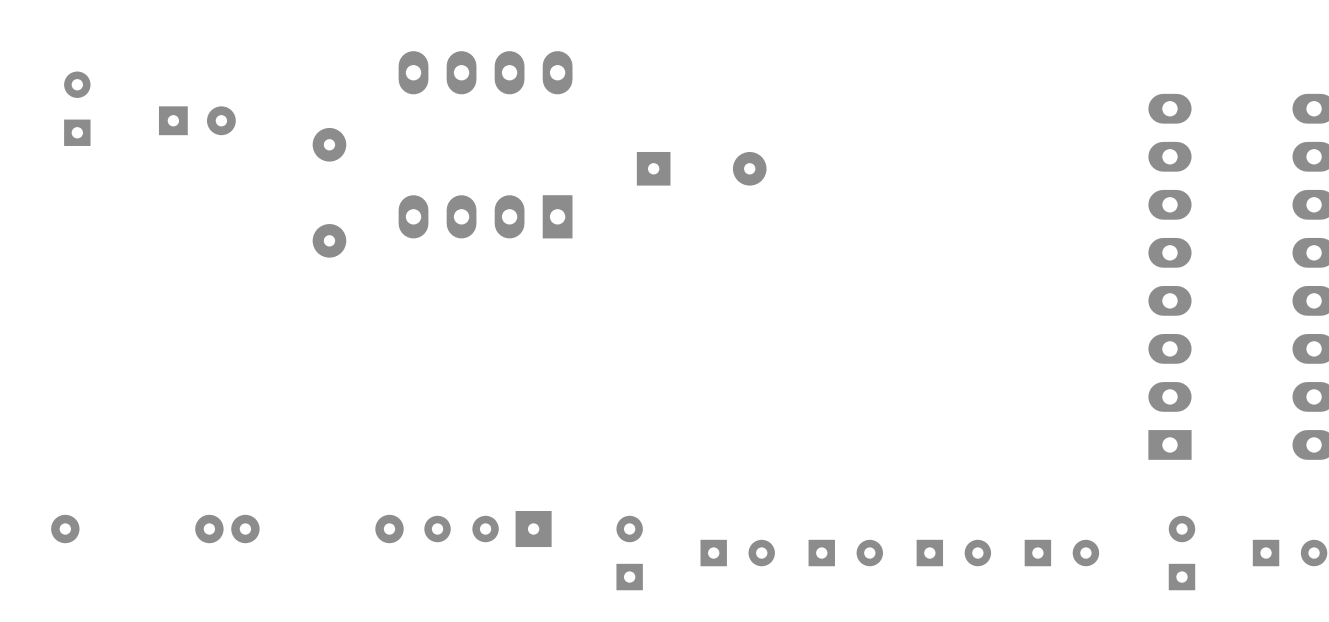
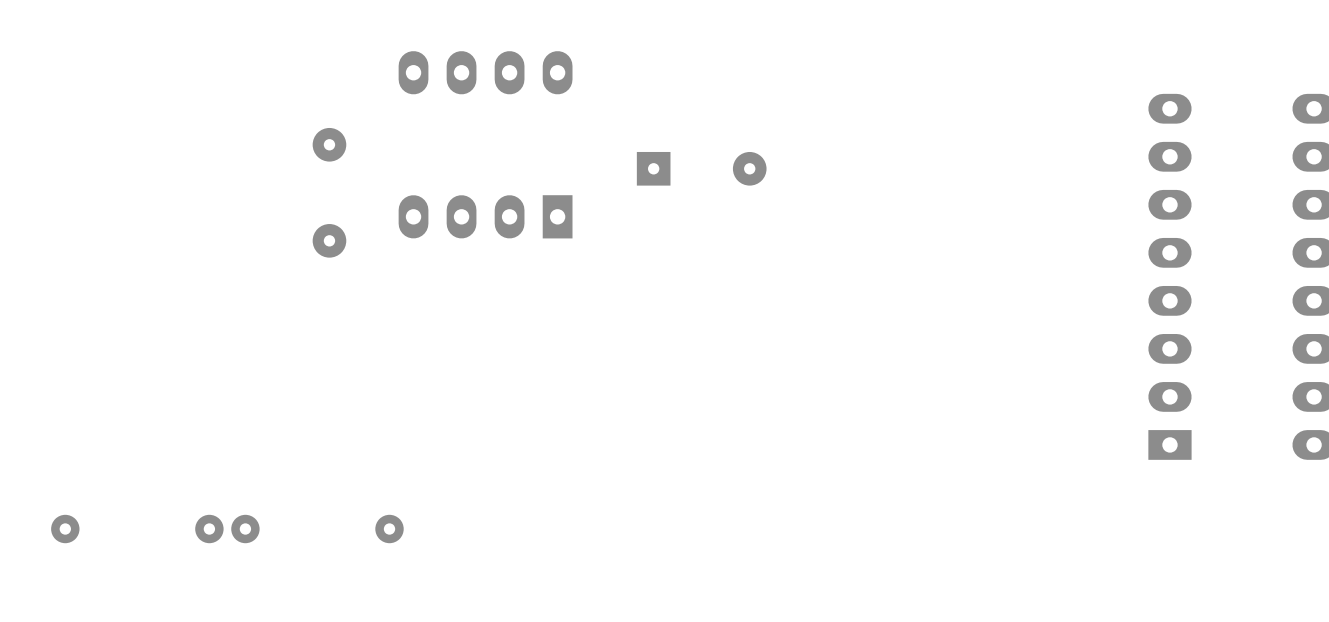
part: (77, 108) -> none
part: (197, 120) -> none
part: (487, 529) -> none
part: (629, 553) -> none
part: (737, 553) -> none
part: (845, 553) -> none
part: (953, 553) -> none
part: (1061, 553) -> none
part: (1181, 553) -> none
part: (1290, 553) -> none

